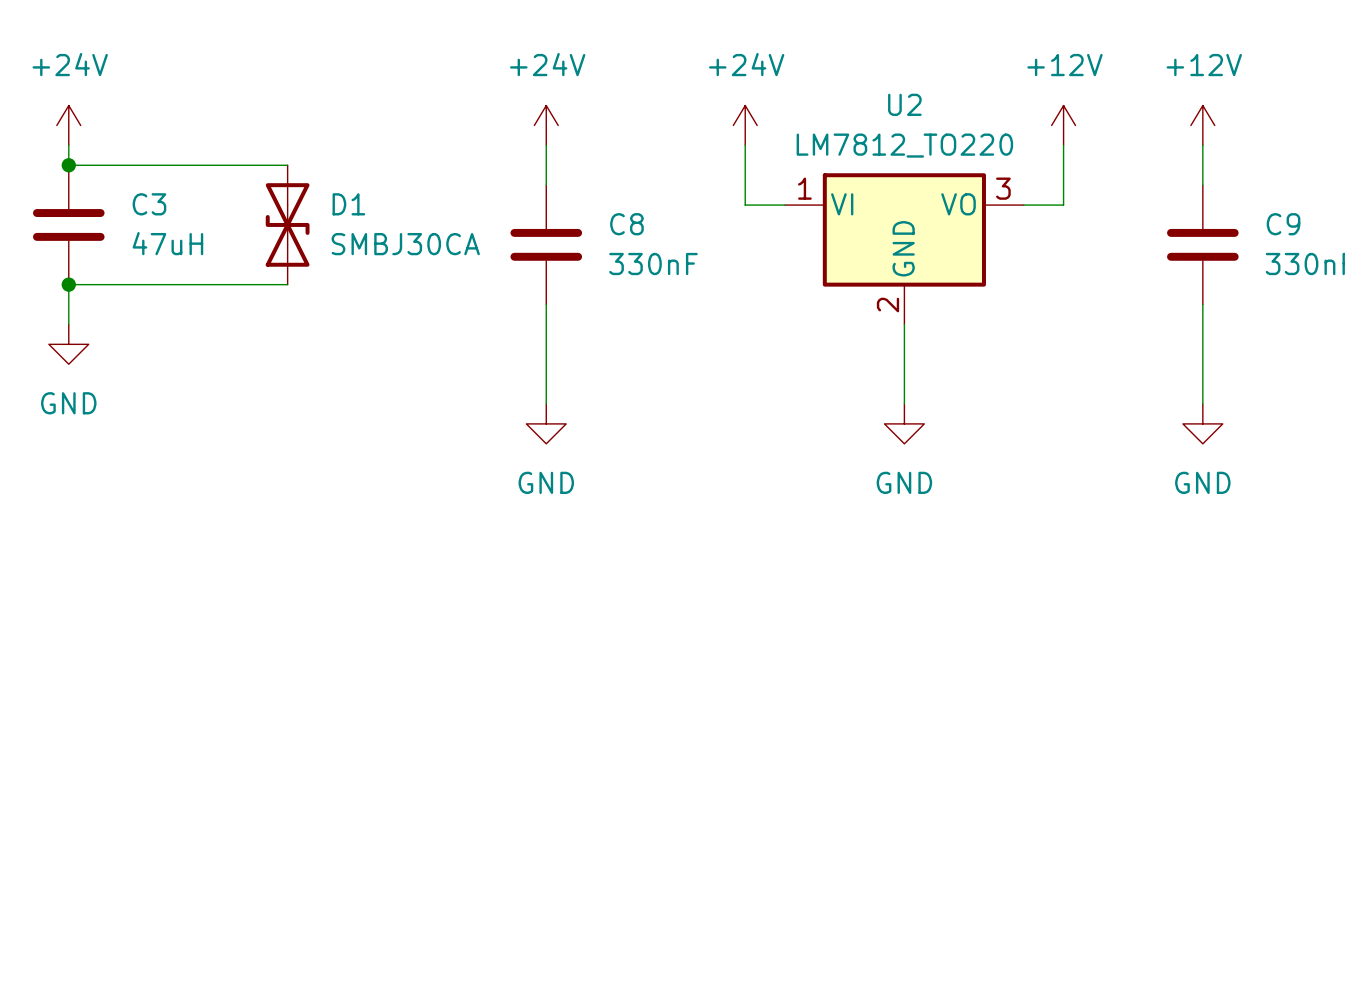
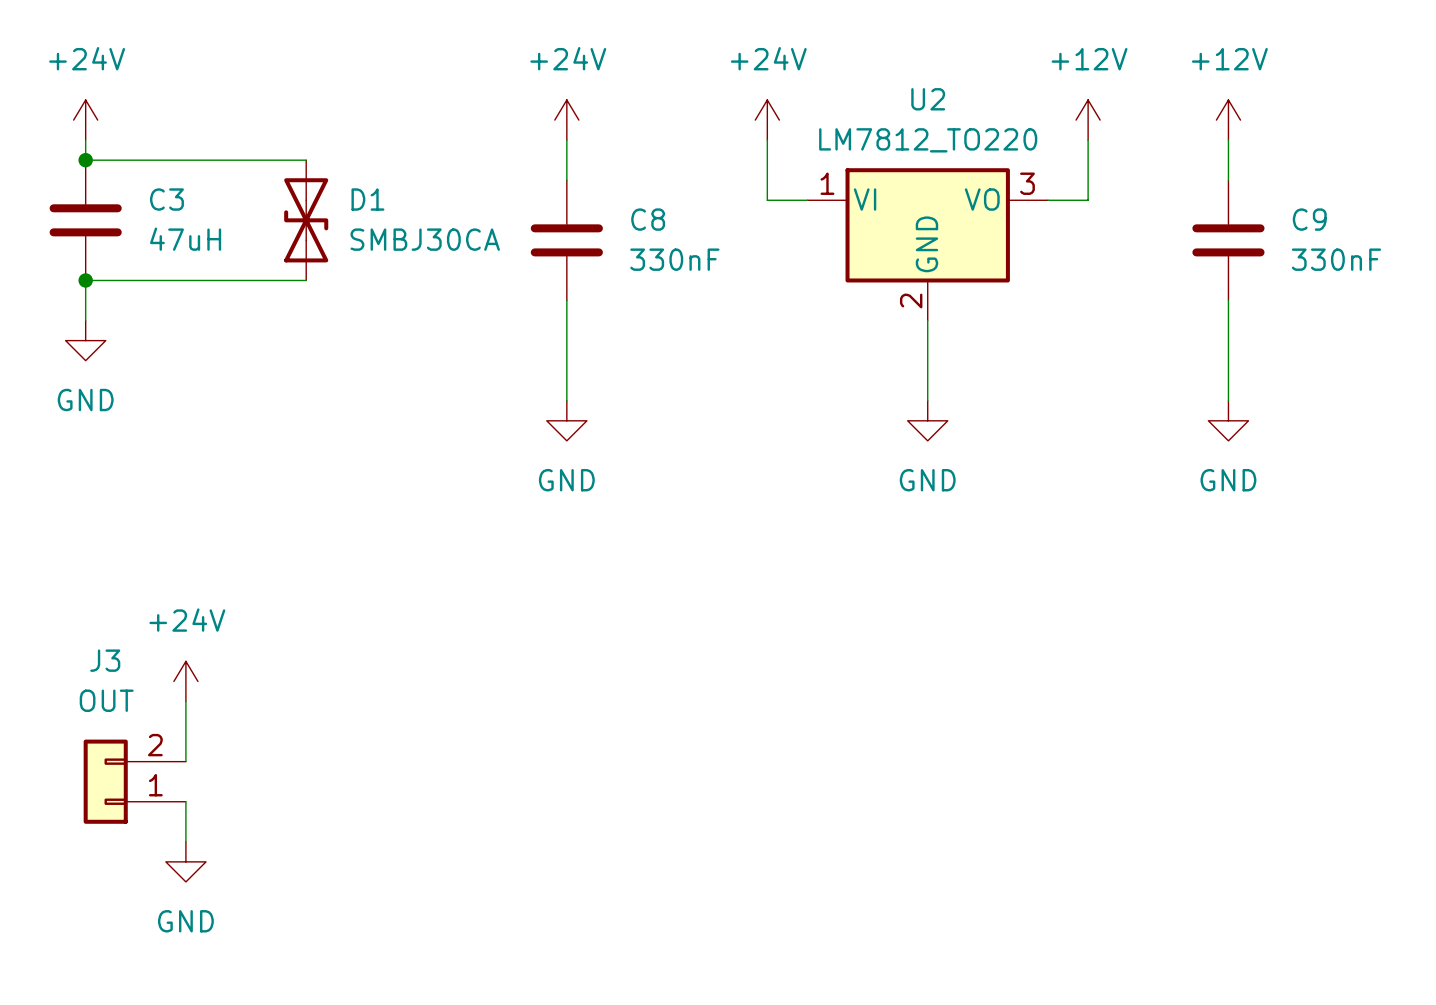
power symbol: none -> +24V (185, 681)
wire: none -> (185, 701) (185, 761)
J3: none -> OUT (134, 781)
wire: none -> (185, 801) (185, 841)
power symbol: none -> GND (185, 861)

